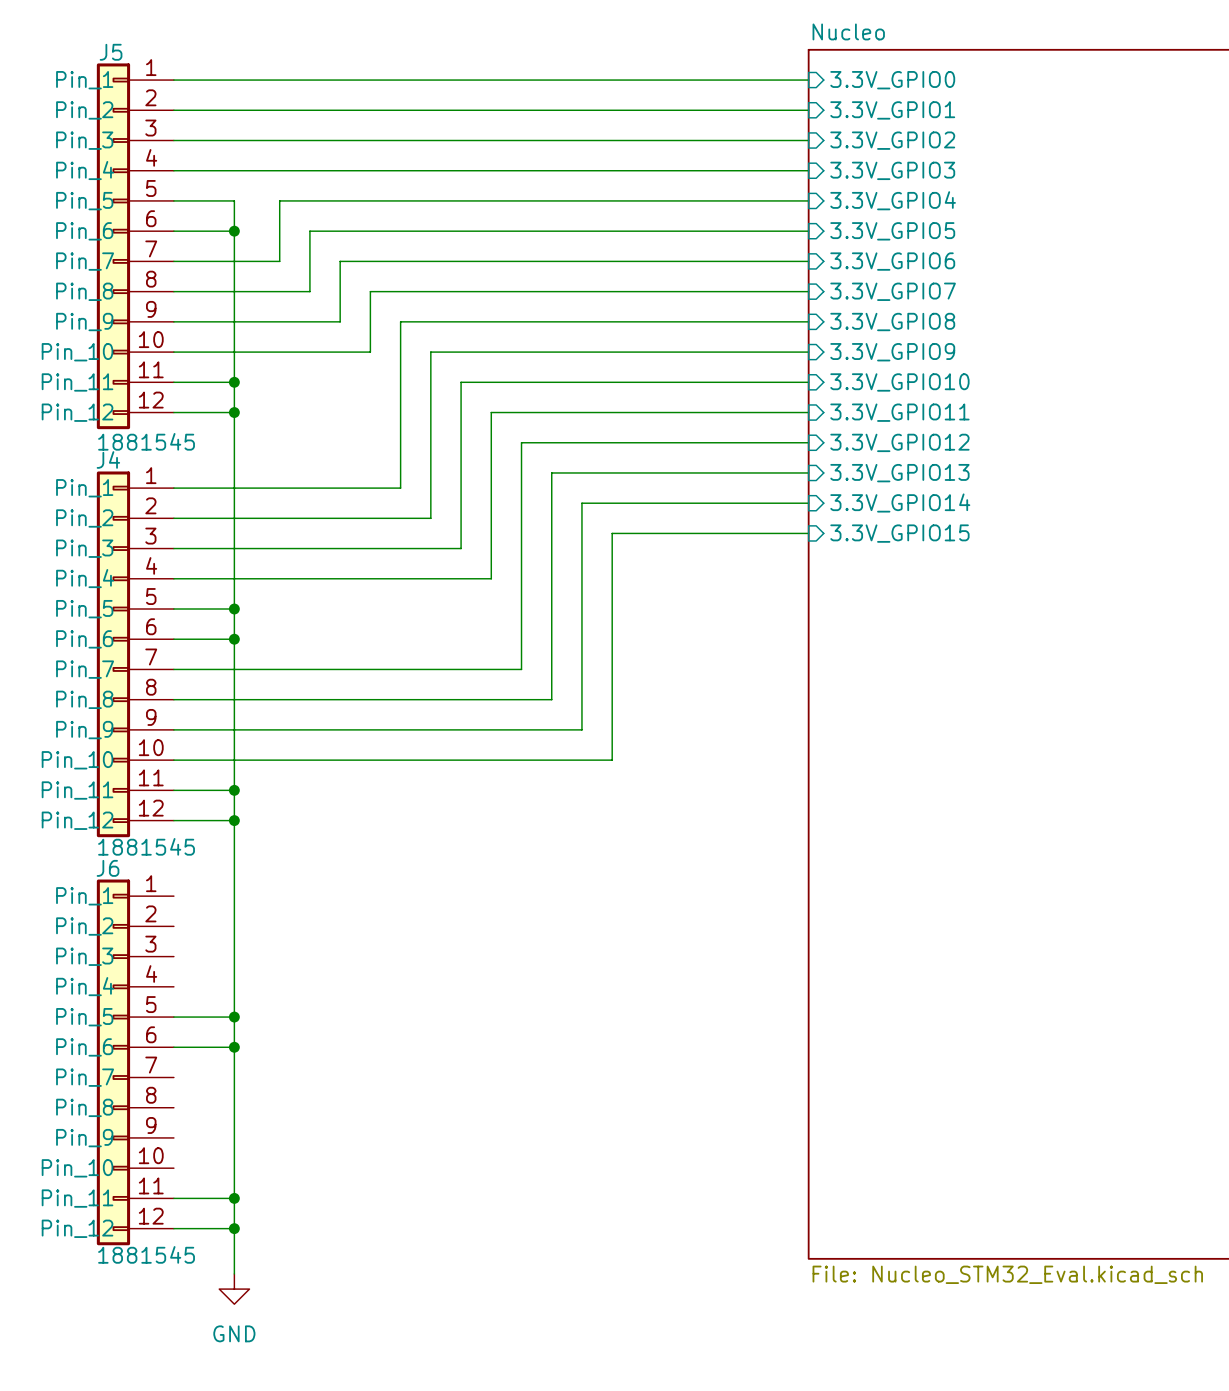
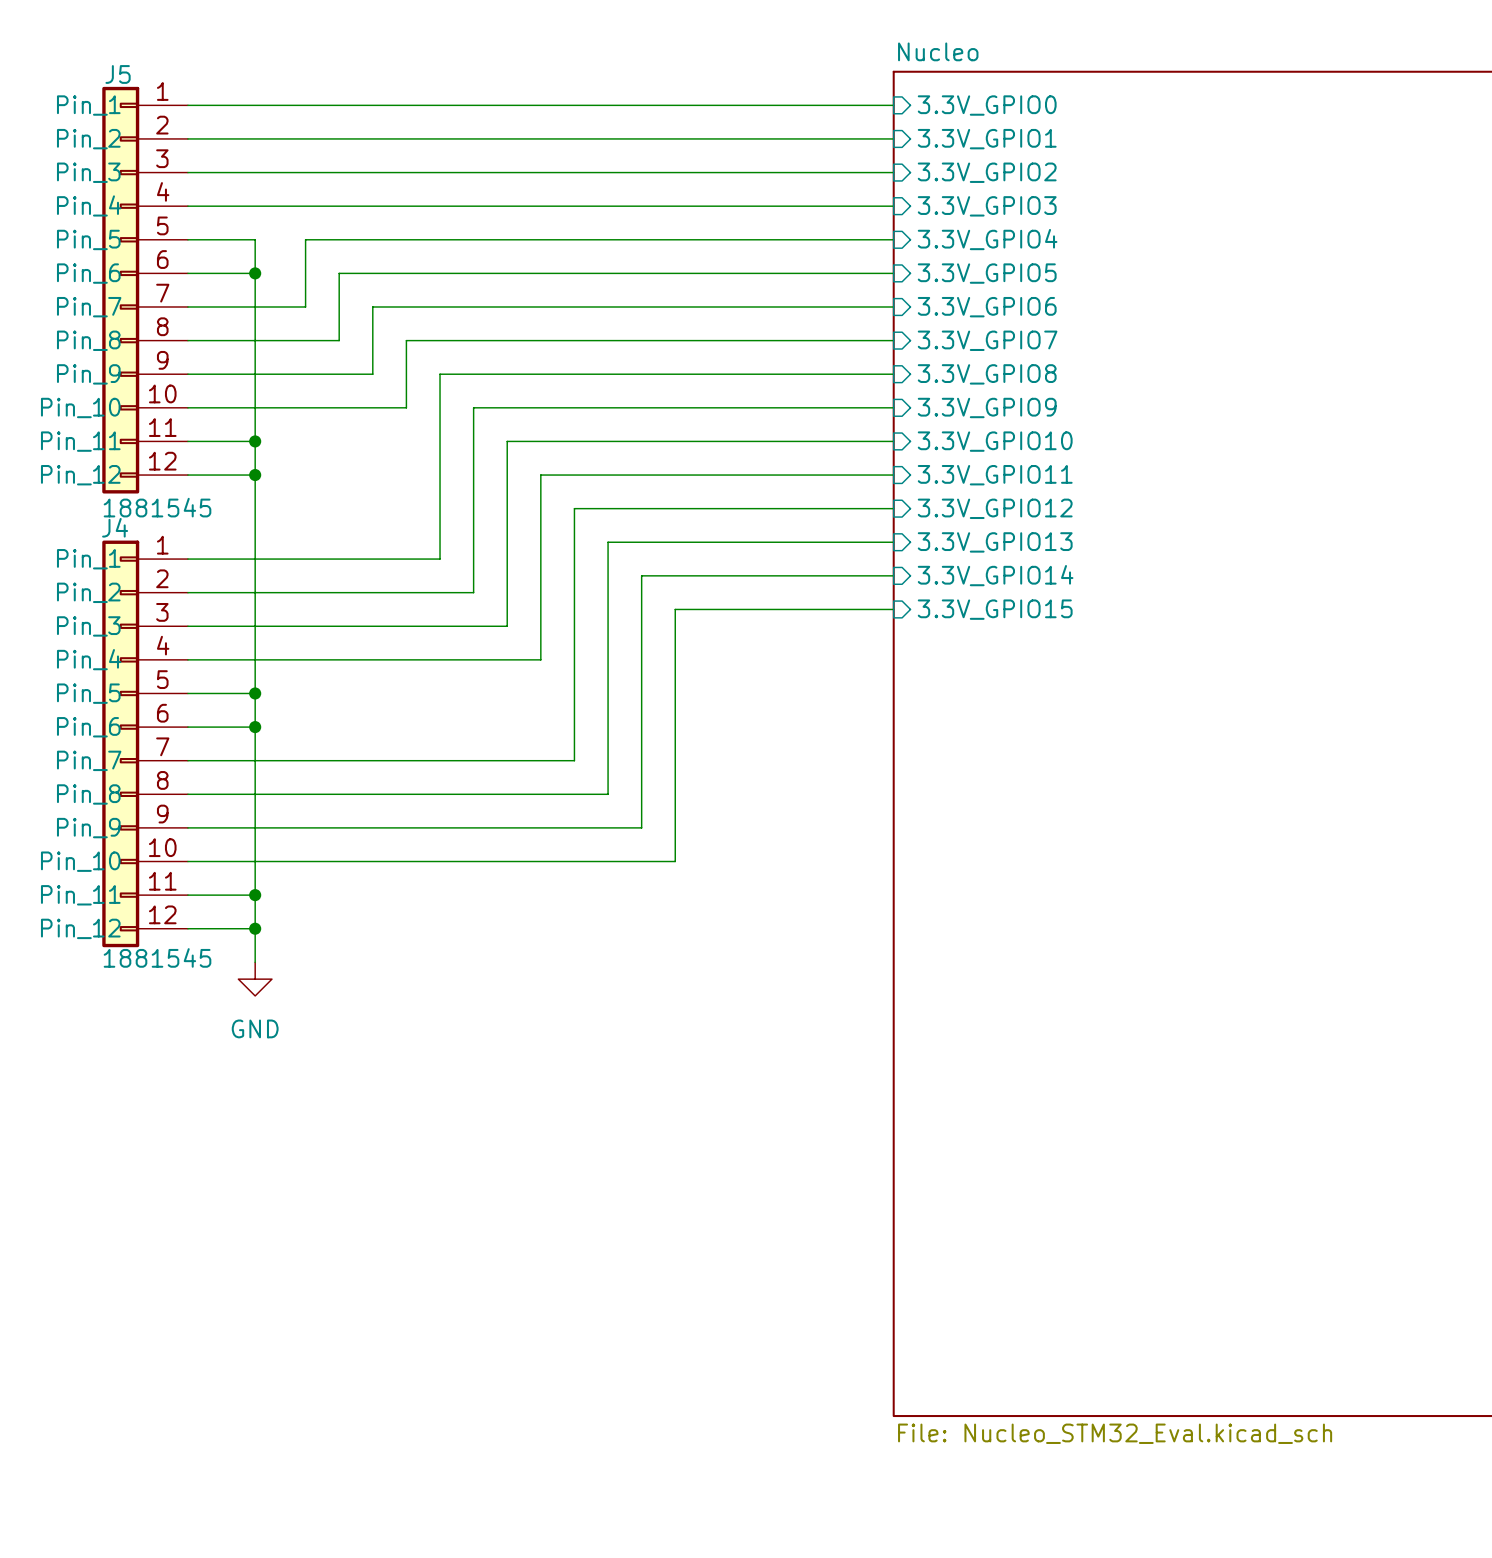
wire: (234, 850) (234, 1273) -> none
power symbol: none -> GND (255, 979)
wire: (173, 1017) (234, 1017) -> none
junction: (234, 1017) -> none
wire: (173, 1047) (234, 1047) -> none
junction: (234, 1047) -> none
J6: 1881545 (135, 1062) -> none
wire: (173, 1198) (234, 1198) -> none
junction: (234, 1198) -> none
wire: (173, 1228) (234, 1228) -> none
junction: (234, 1228) -> none
power symbol: GND (234, 1289) -> none

